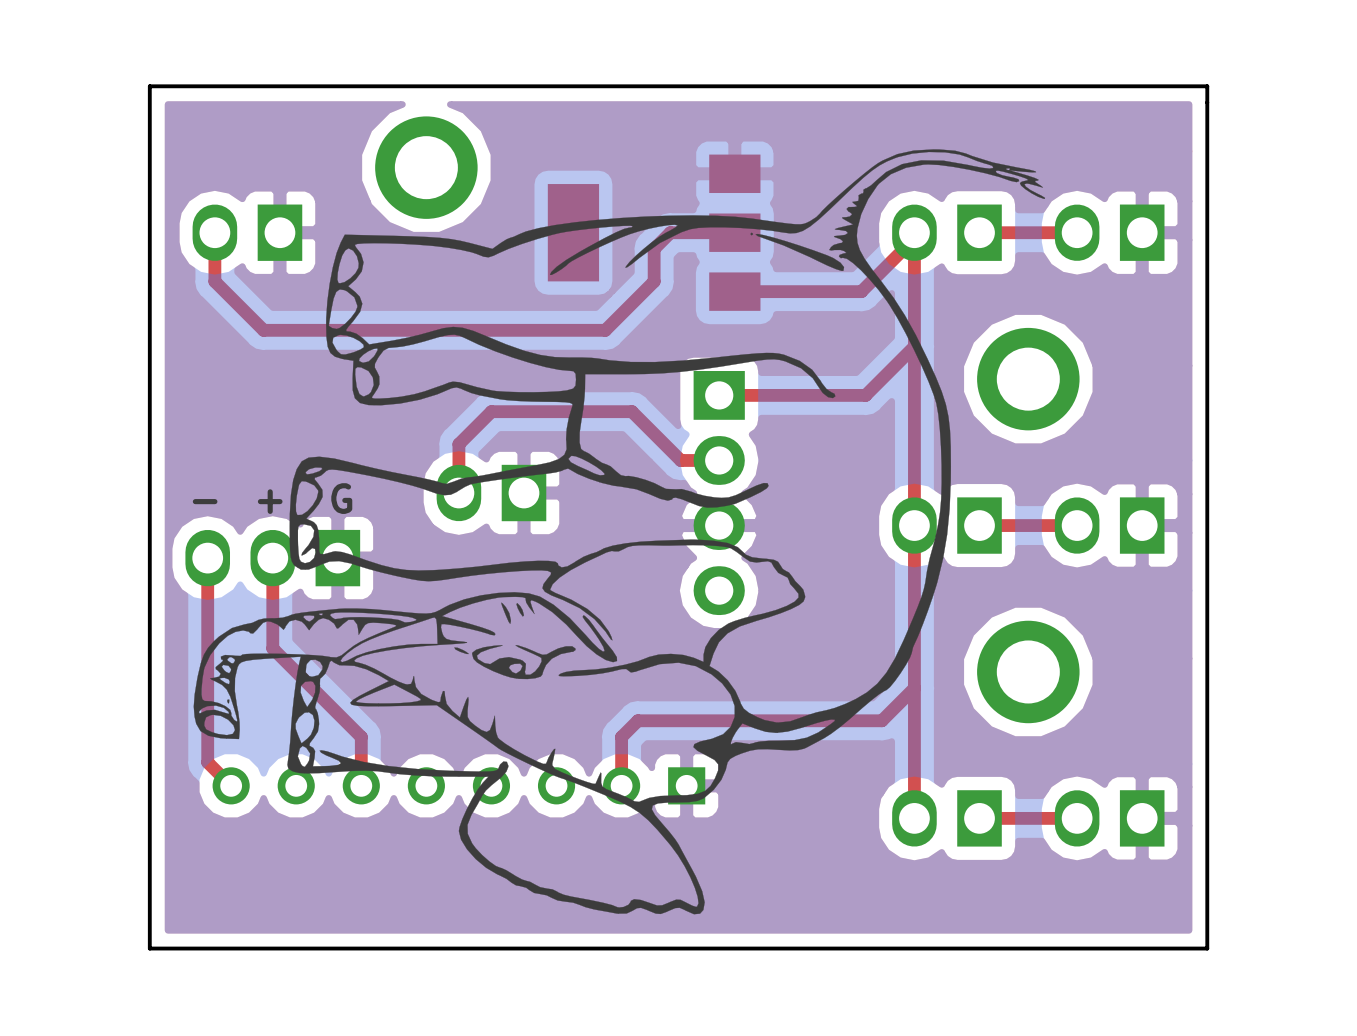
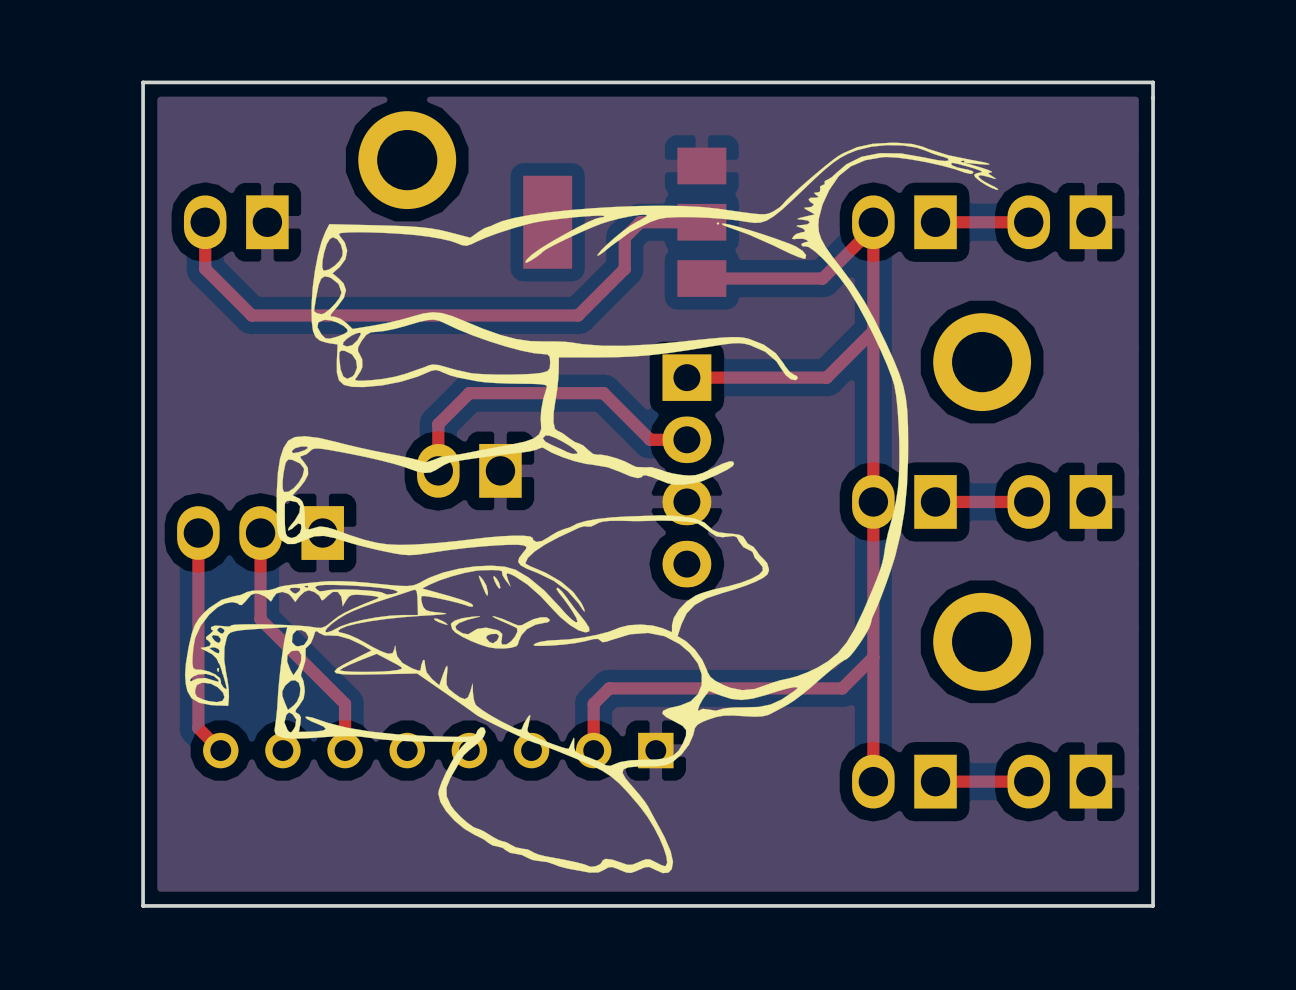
text: G (341, 498) -> none
text: - (205, 501) -> none
text: + (270, 501) -> none

